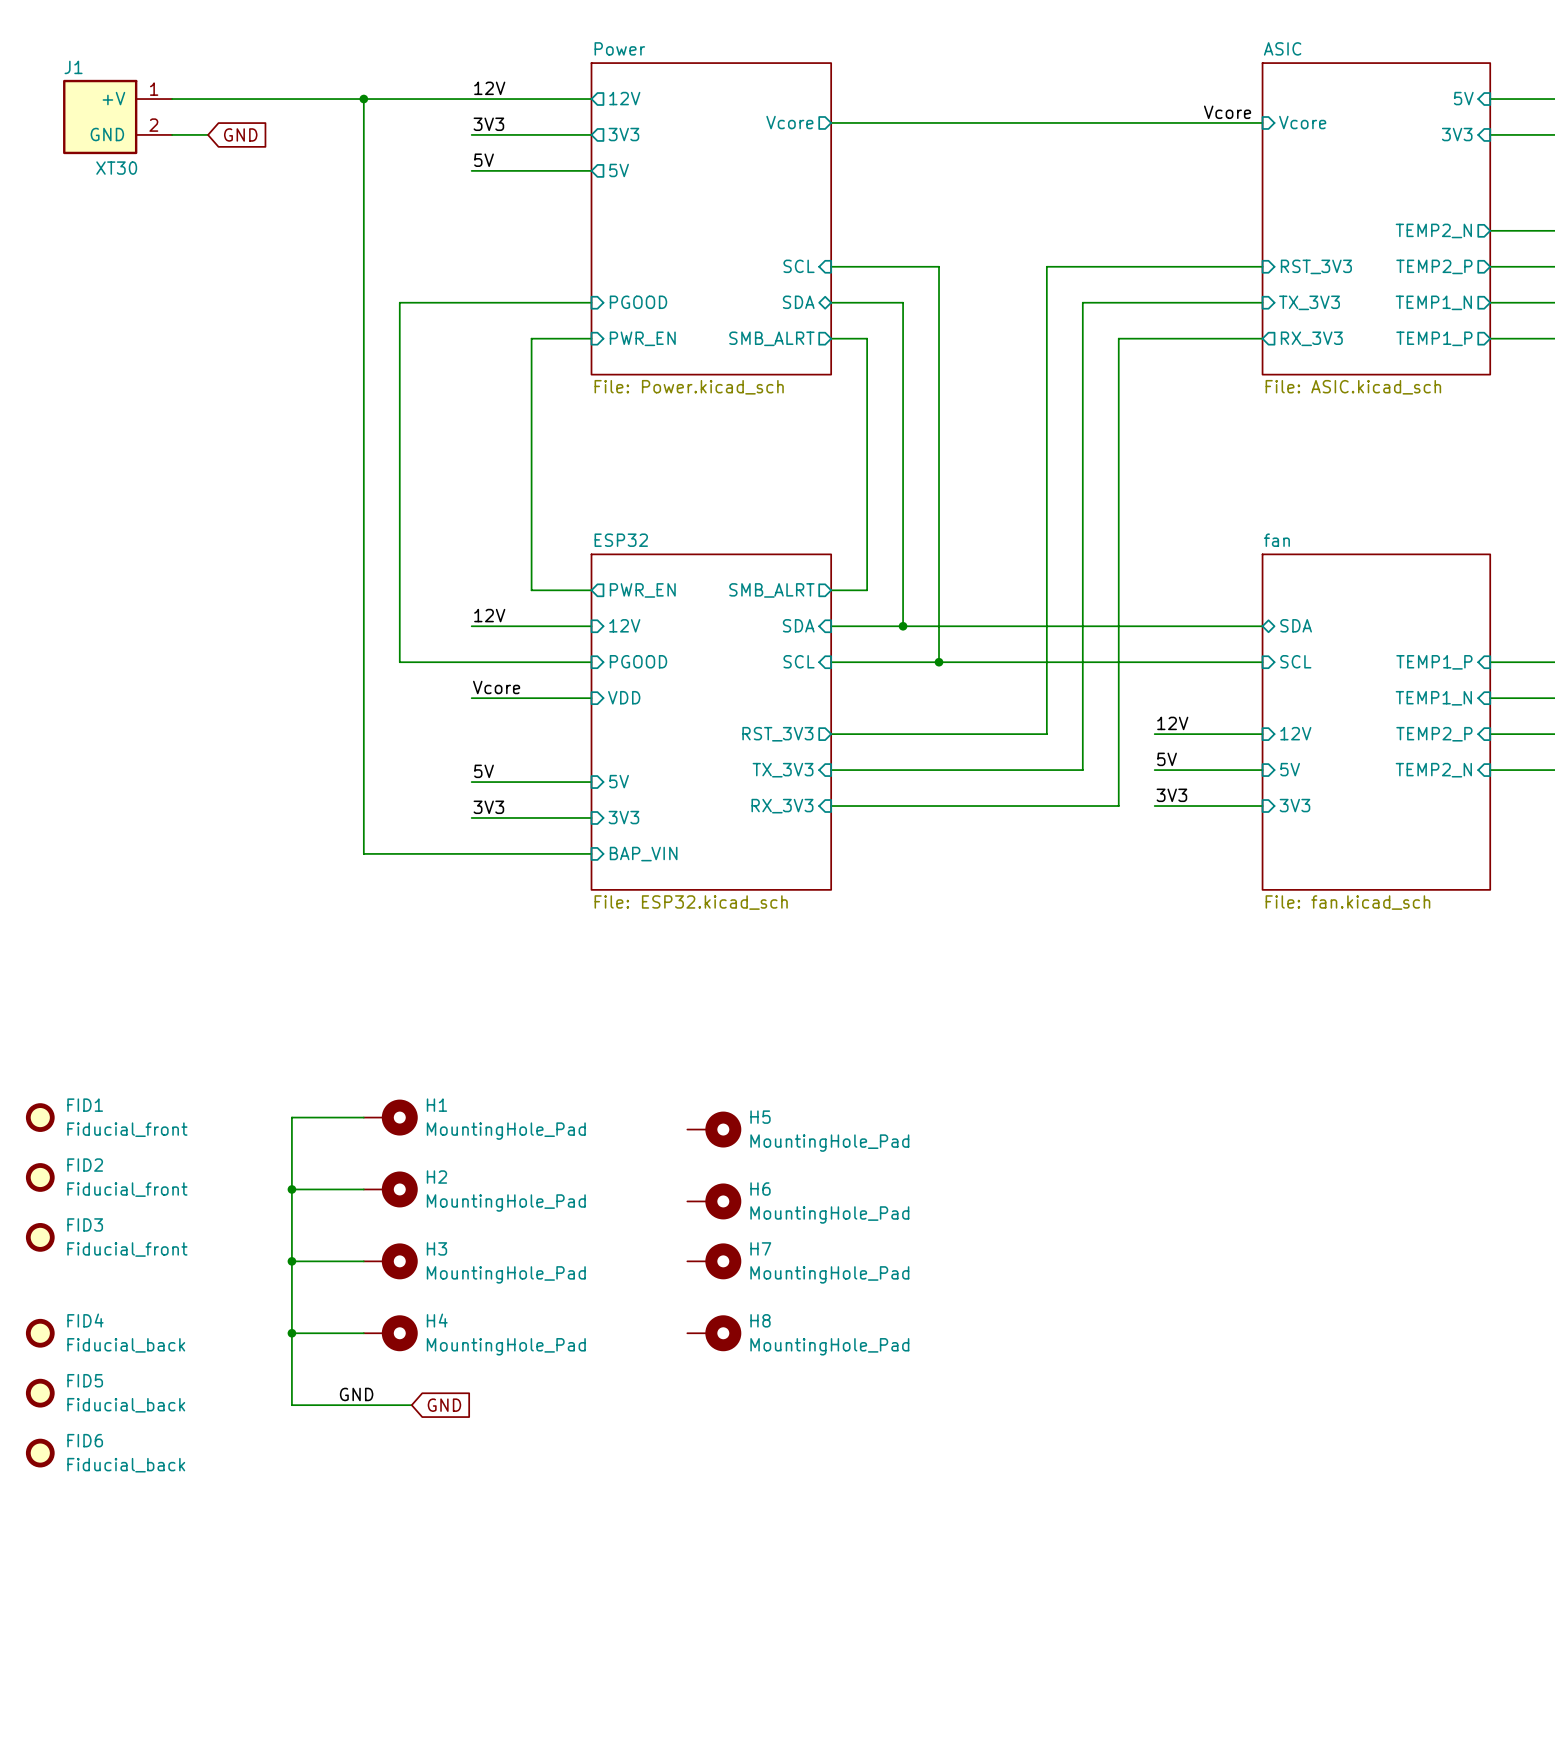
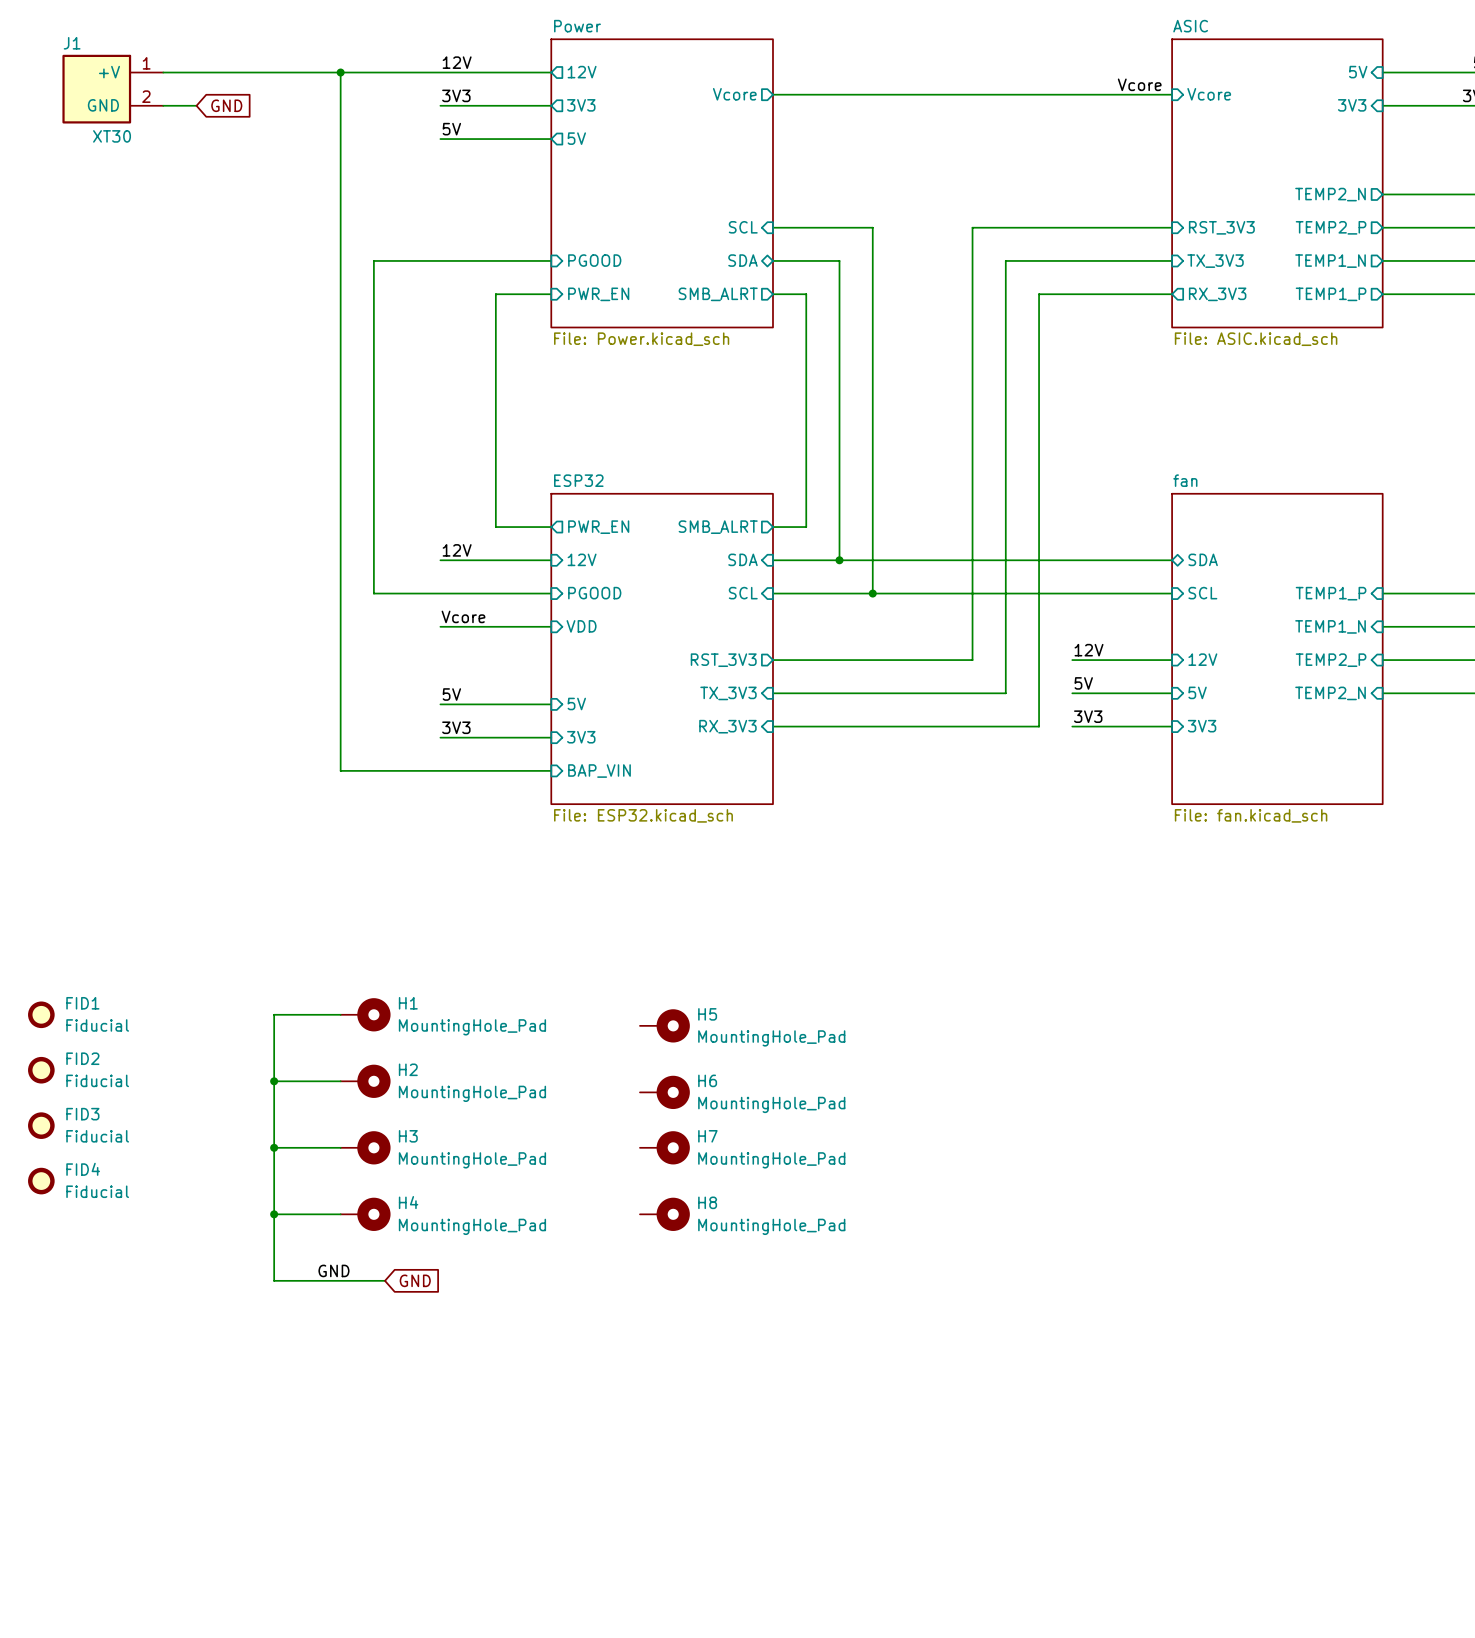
FID1 value: Fiducial_front (127, 1129) -> Fiducial (97, 1025)
FID2 value: Fiducial_front (127, 1189) -> Fiducial (97, 1080)
FID3 value: Fiducial_front (127, 1249) -> Fiducial (97, 1136)
FID4 position: (40, 1333) -> (41, 1181)
FID4 value: Fiducial_back (126, 1345) -> Fiducial (97, 1191)
FID5: Fiducial_back (40, 1393) -> none
FID6: Fiducial_back (40, 1453) -> none

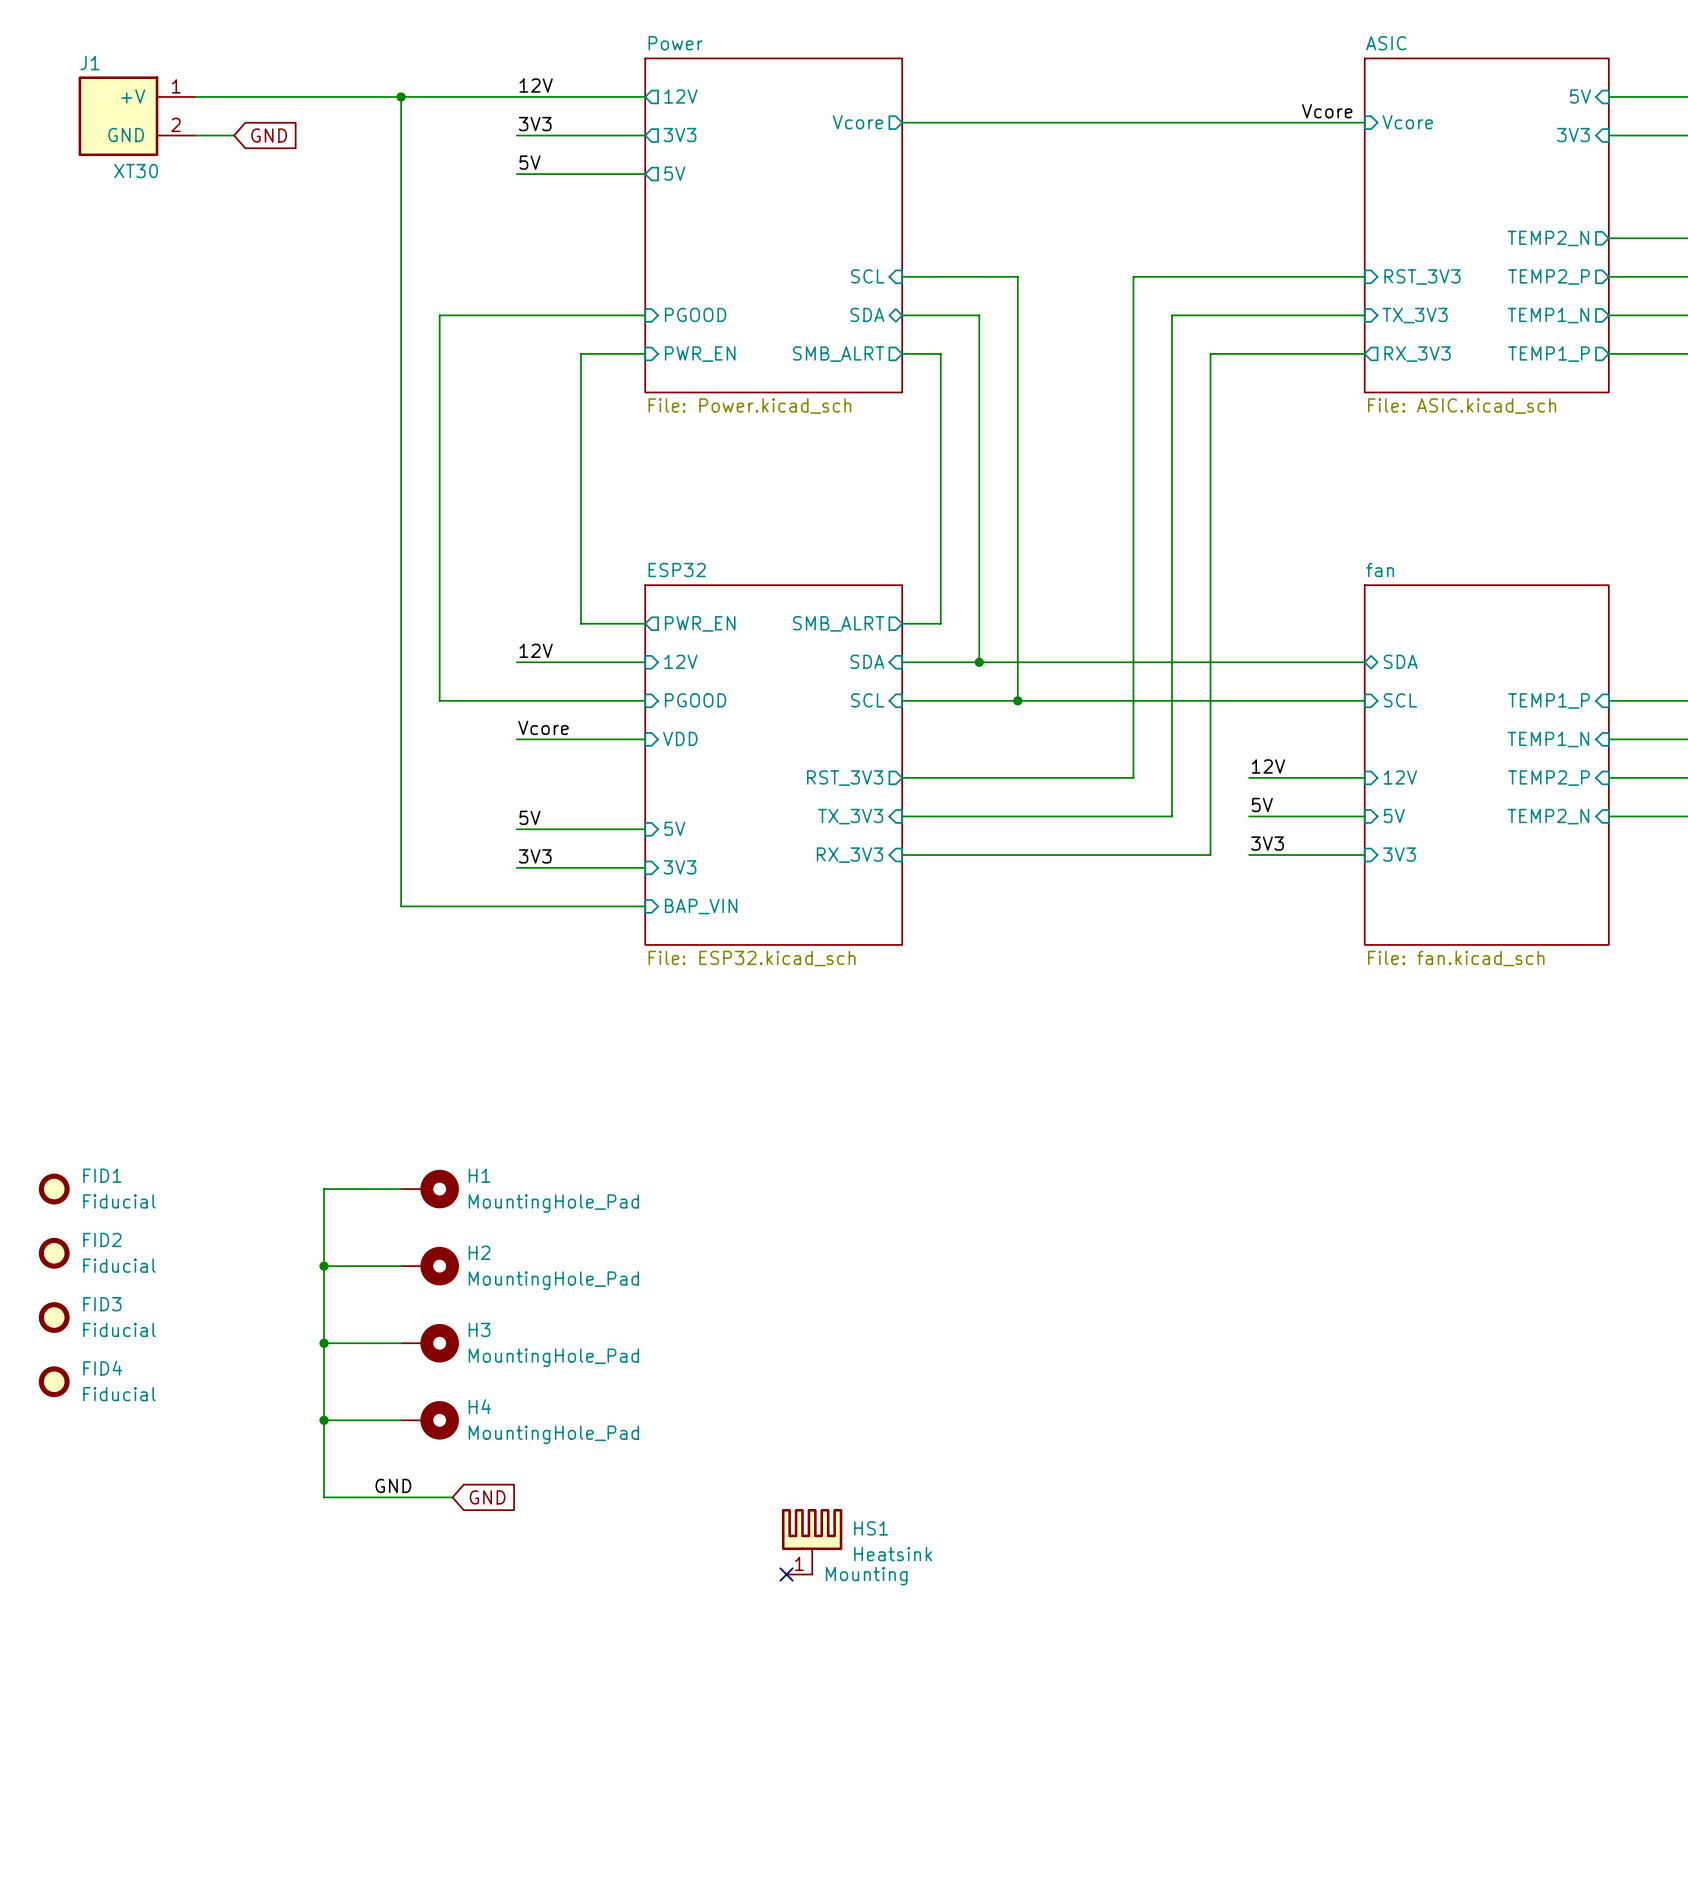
H5: MountingHole_Pad (664, 1025) -> none
H6: MountingHole_Pad (664, 1092) -> none
H7: MountingHole_Pad (664, 1147) -> none
H8: MountingHole_Pad (664, 1214) -> none
HS1: none -> Heatsink (812, 1541)
no-connect mark: none -> (786, 1574)

